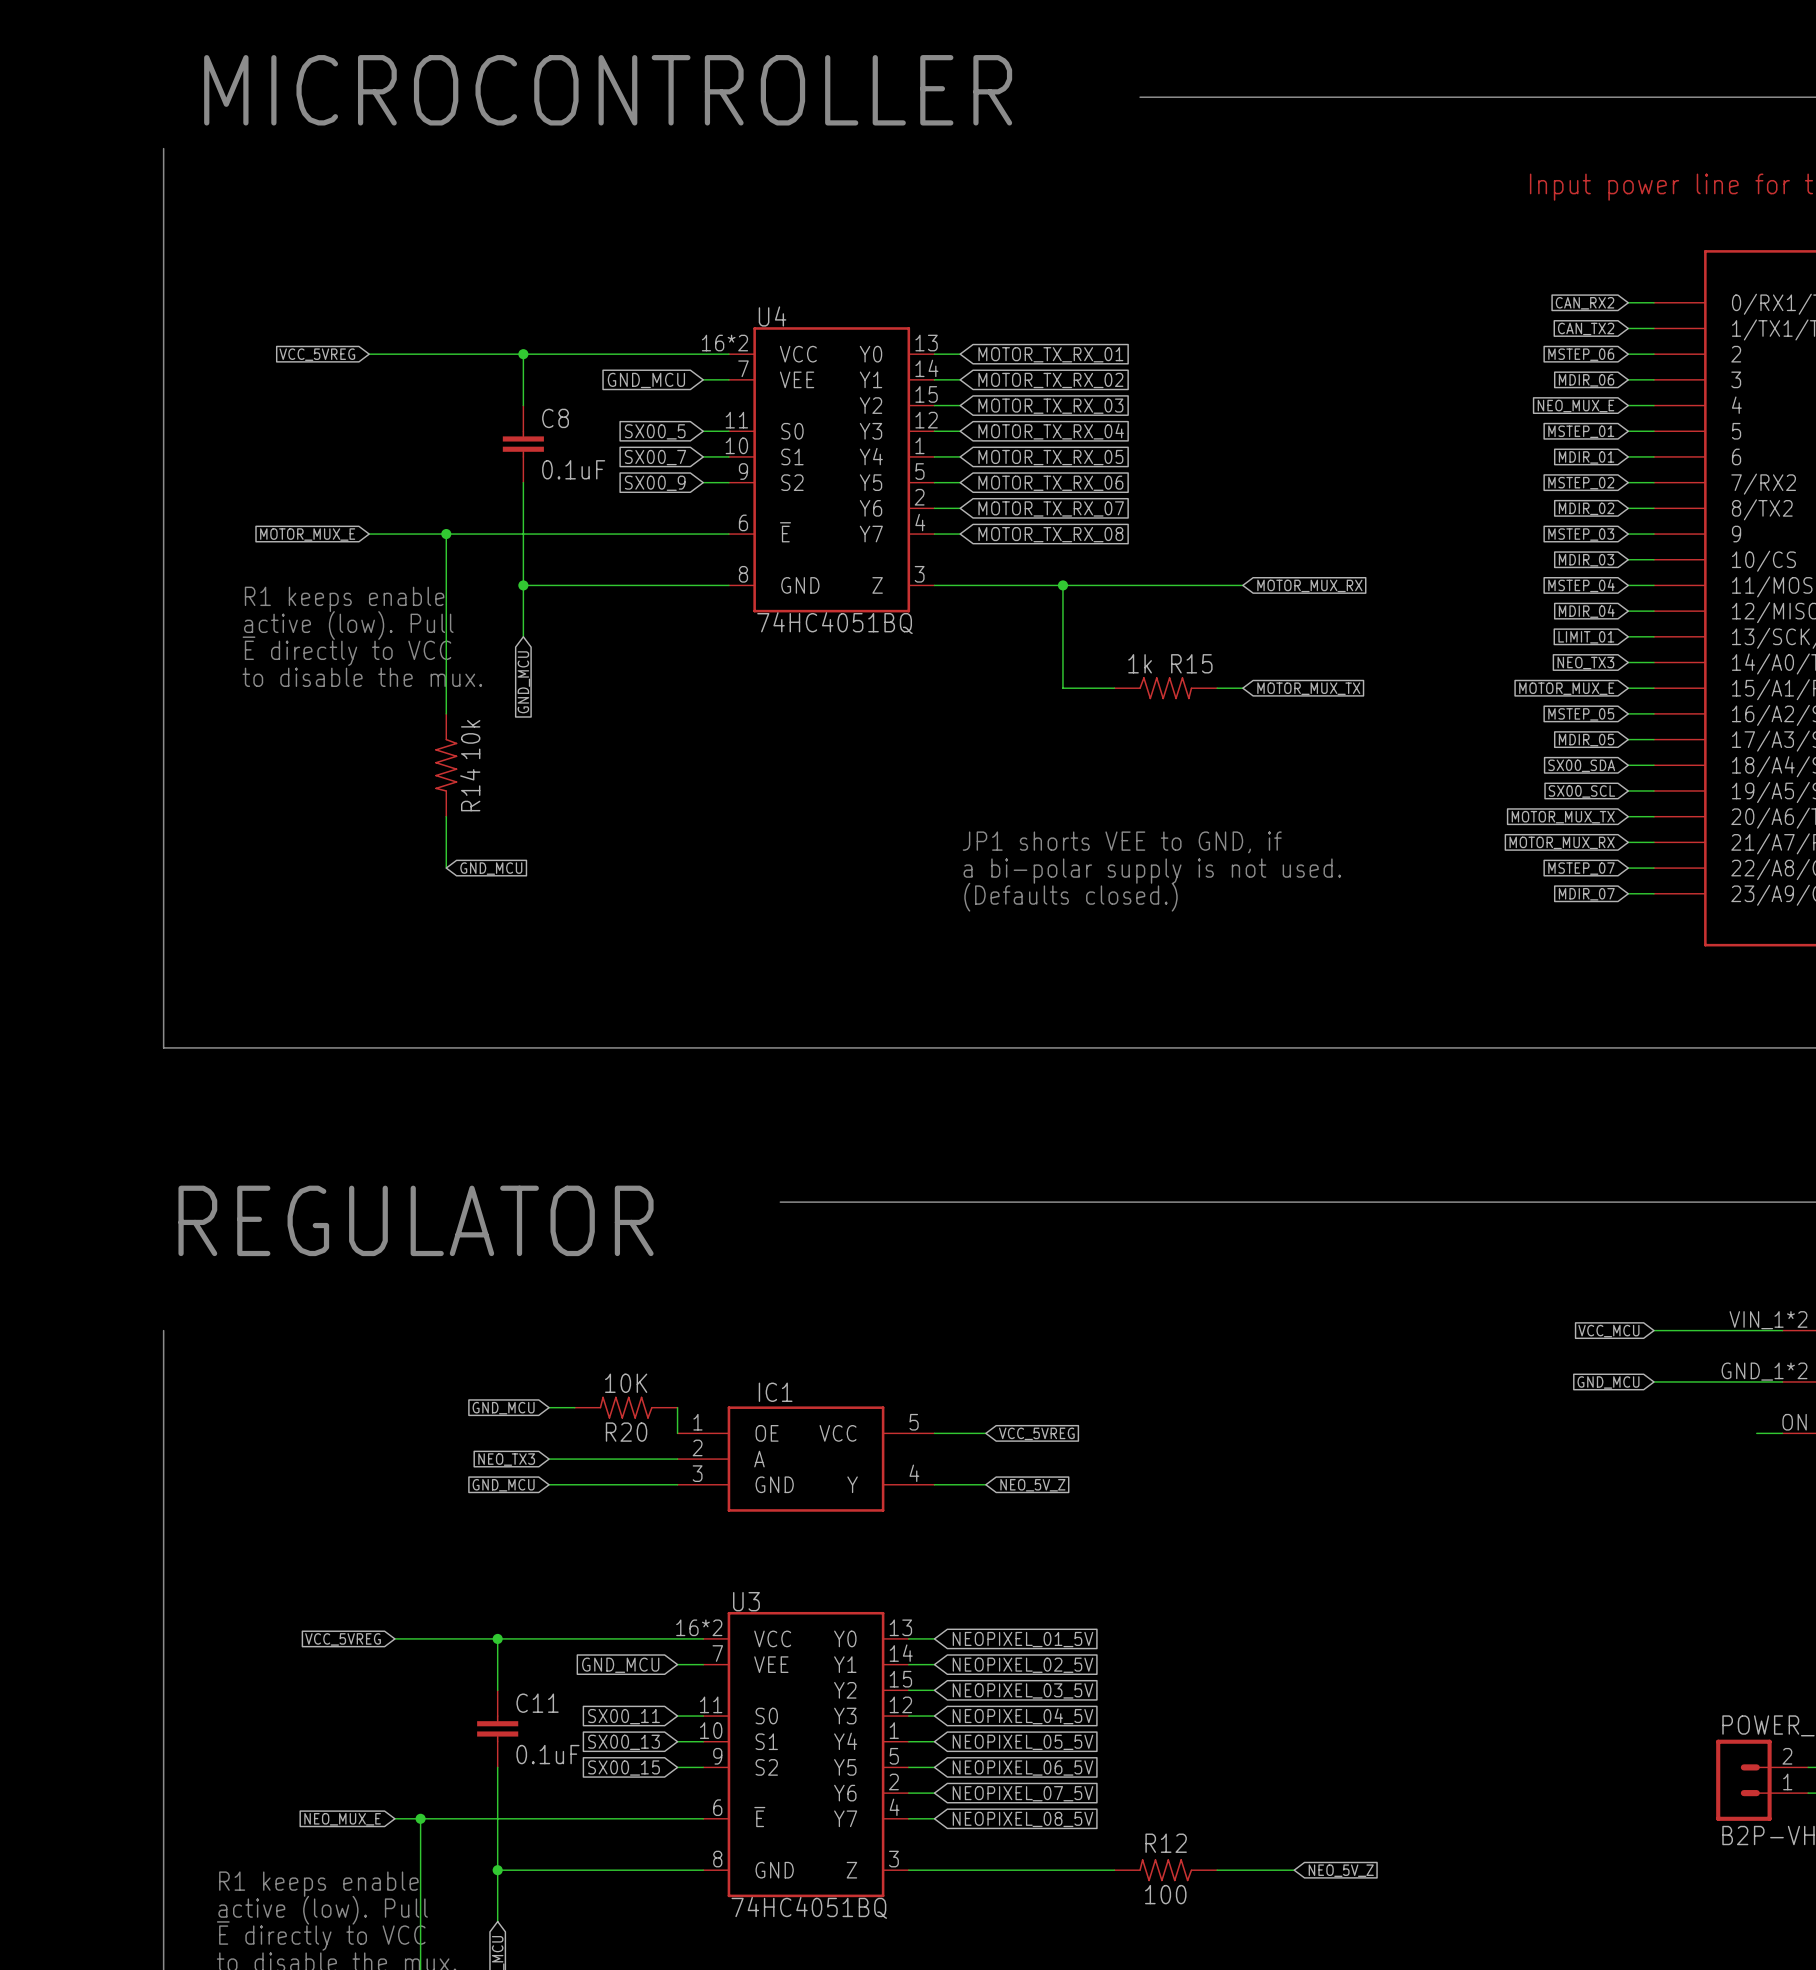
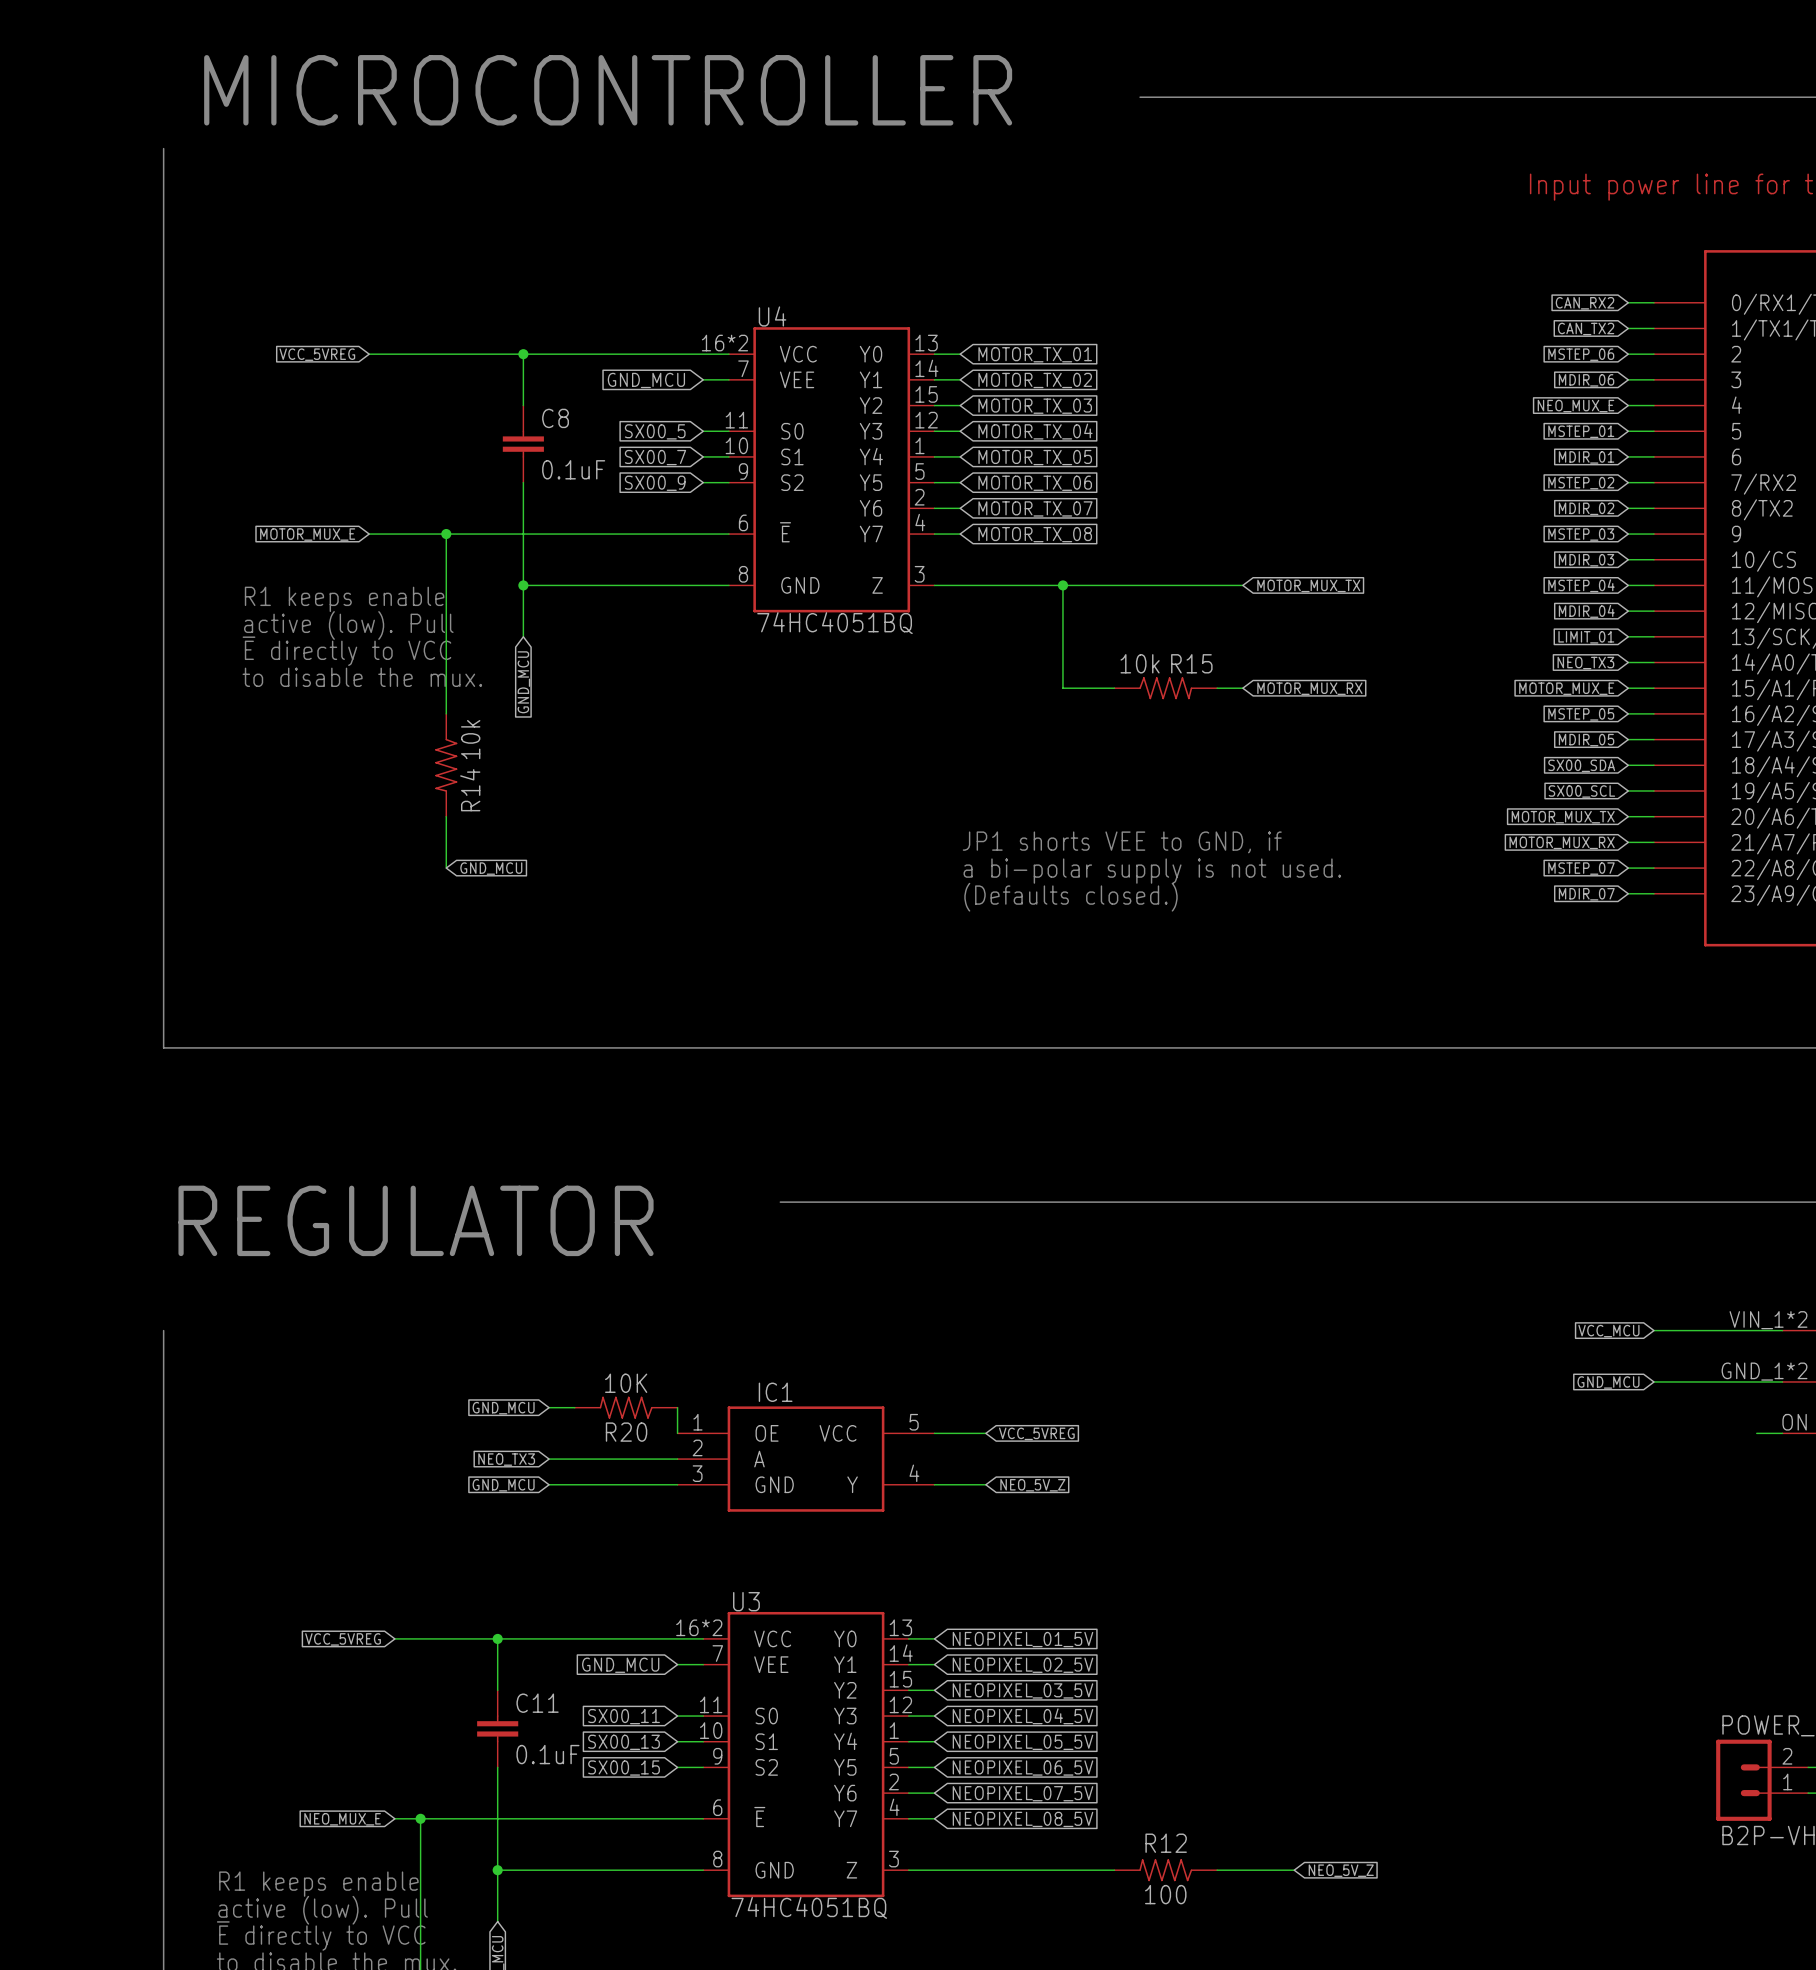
global label: MOTOR_TX_RX_01 (1050, 354) -> MOTOR_TX_01 (1035, 354)
global label: MOTOR_TX_RX_02 (1050, 380) -> MOTOR_TX_02 (1035, 380)
global label: MOTOR_TX_RX_03 (1050, 406) -> MOTOR_TX_03 (1035, 406)
global label: MOTOR_TX_RX_04 (1051, 431) -> MOTOR_TX_04 (1035, 431)
global label: MOTOR_TX_RX_05 (1050, 457) -> MOTOR_TX_05 (1035, 457)
global label: MOTOR_TX_RX_06 (1050, 483) -> MOTOR_TX_06 (1035, 483)
global label: MOTOR_TX_RX_07 (1051, 508) -> MOTOR_TX_07 (1035, 508)
global label: MOTOR_TX_RX_08 (1050, 534) -> MOTOR_TX_08 (1035, 534)
global label: MOTOR_MUX_RX (1309, 585) -> MOTOR_MUX_TX (1308, 585)
R15 value: 1k (1140, 663) -> 10k (1140, 663)
global label: MOTOR_MUX_TX (1308, 688) -> MOTOR_MUX_RX (1309, 688)

